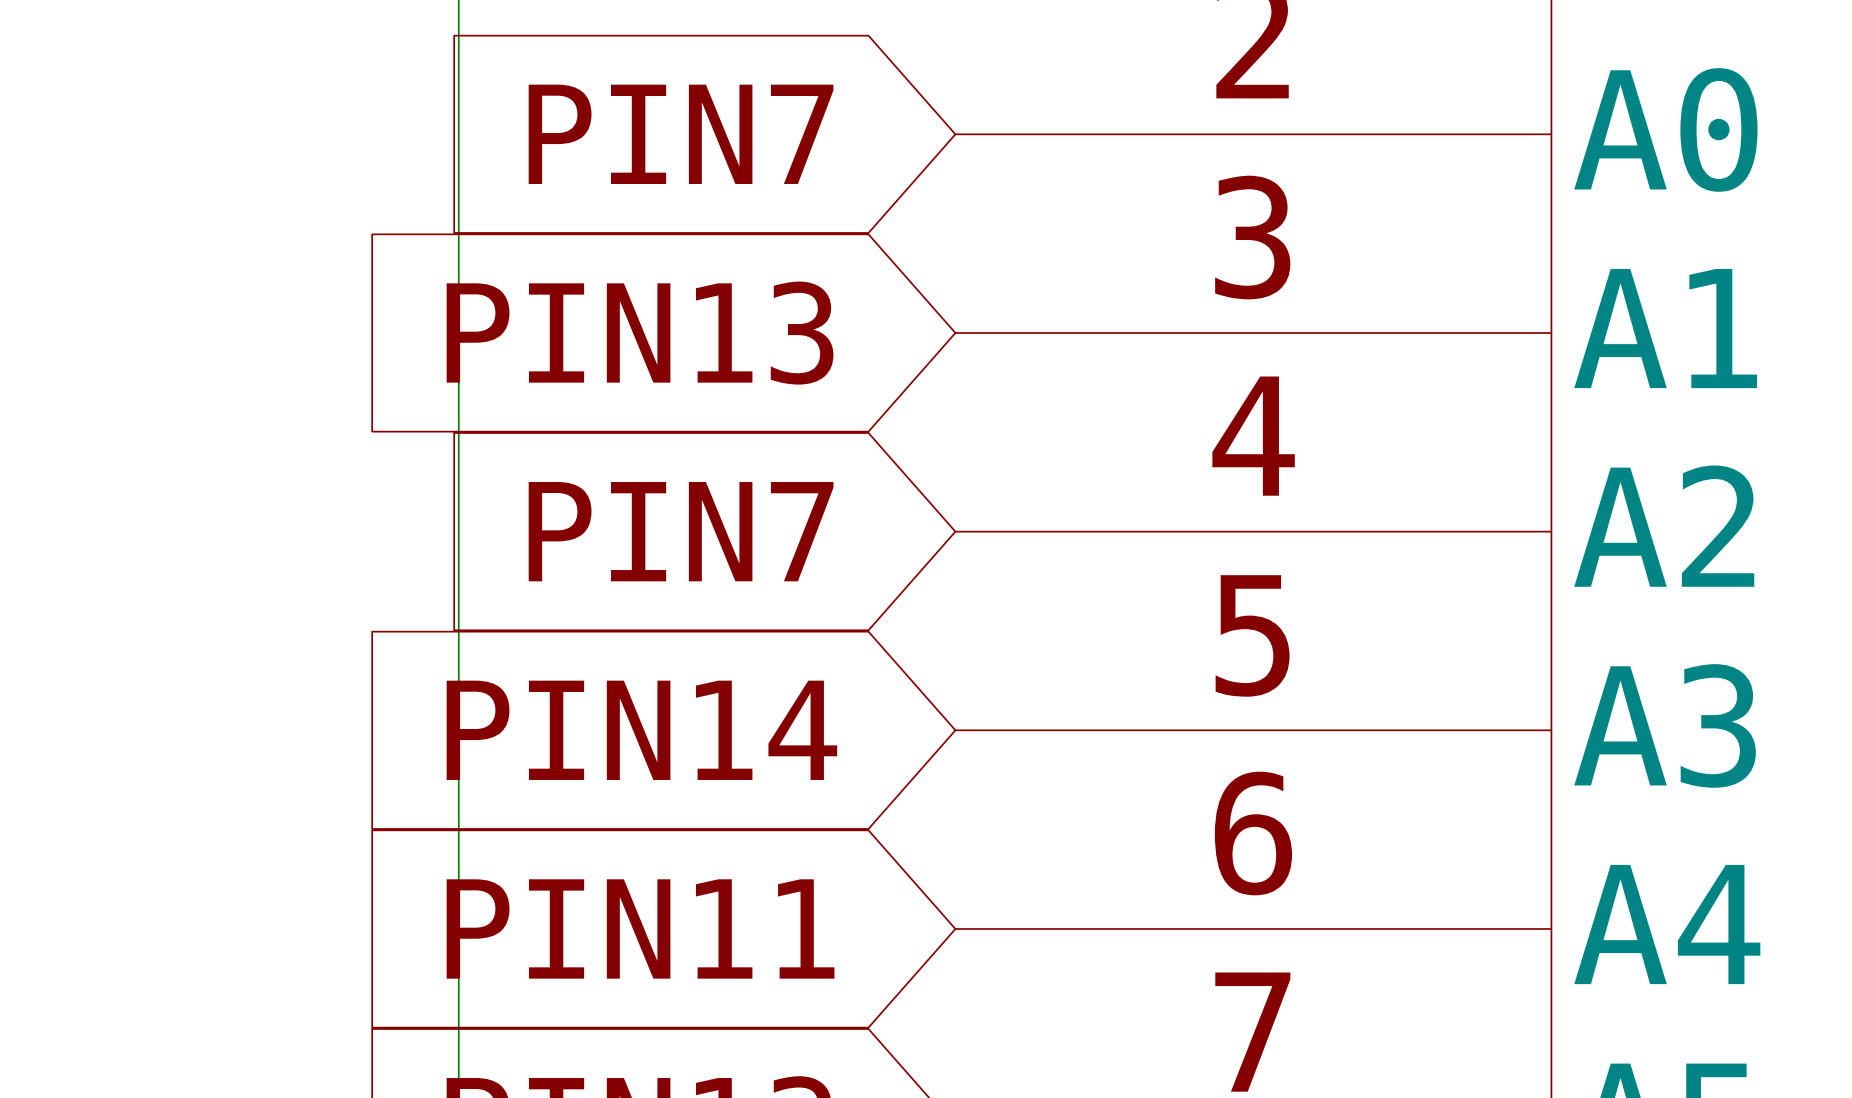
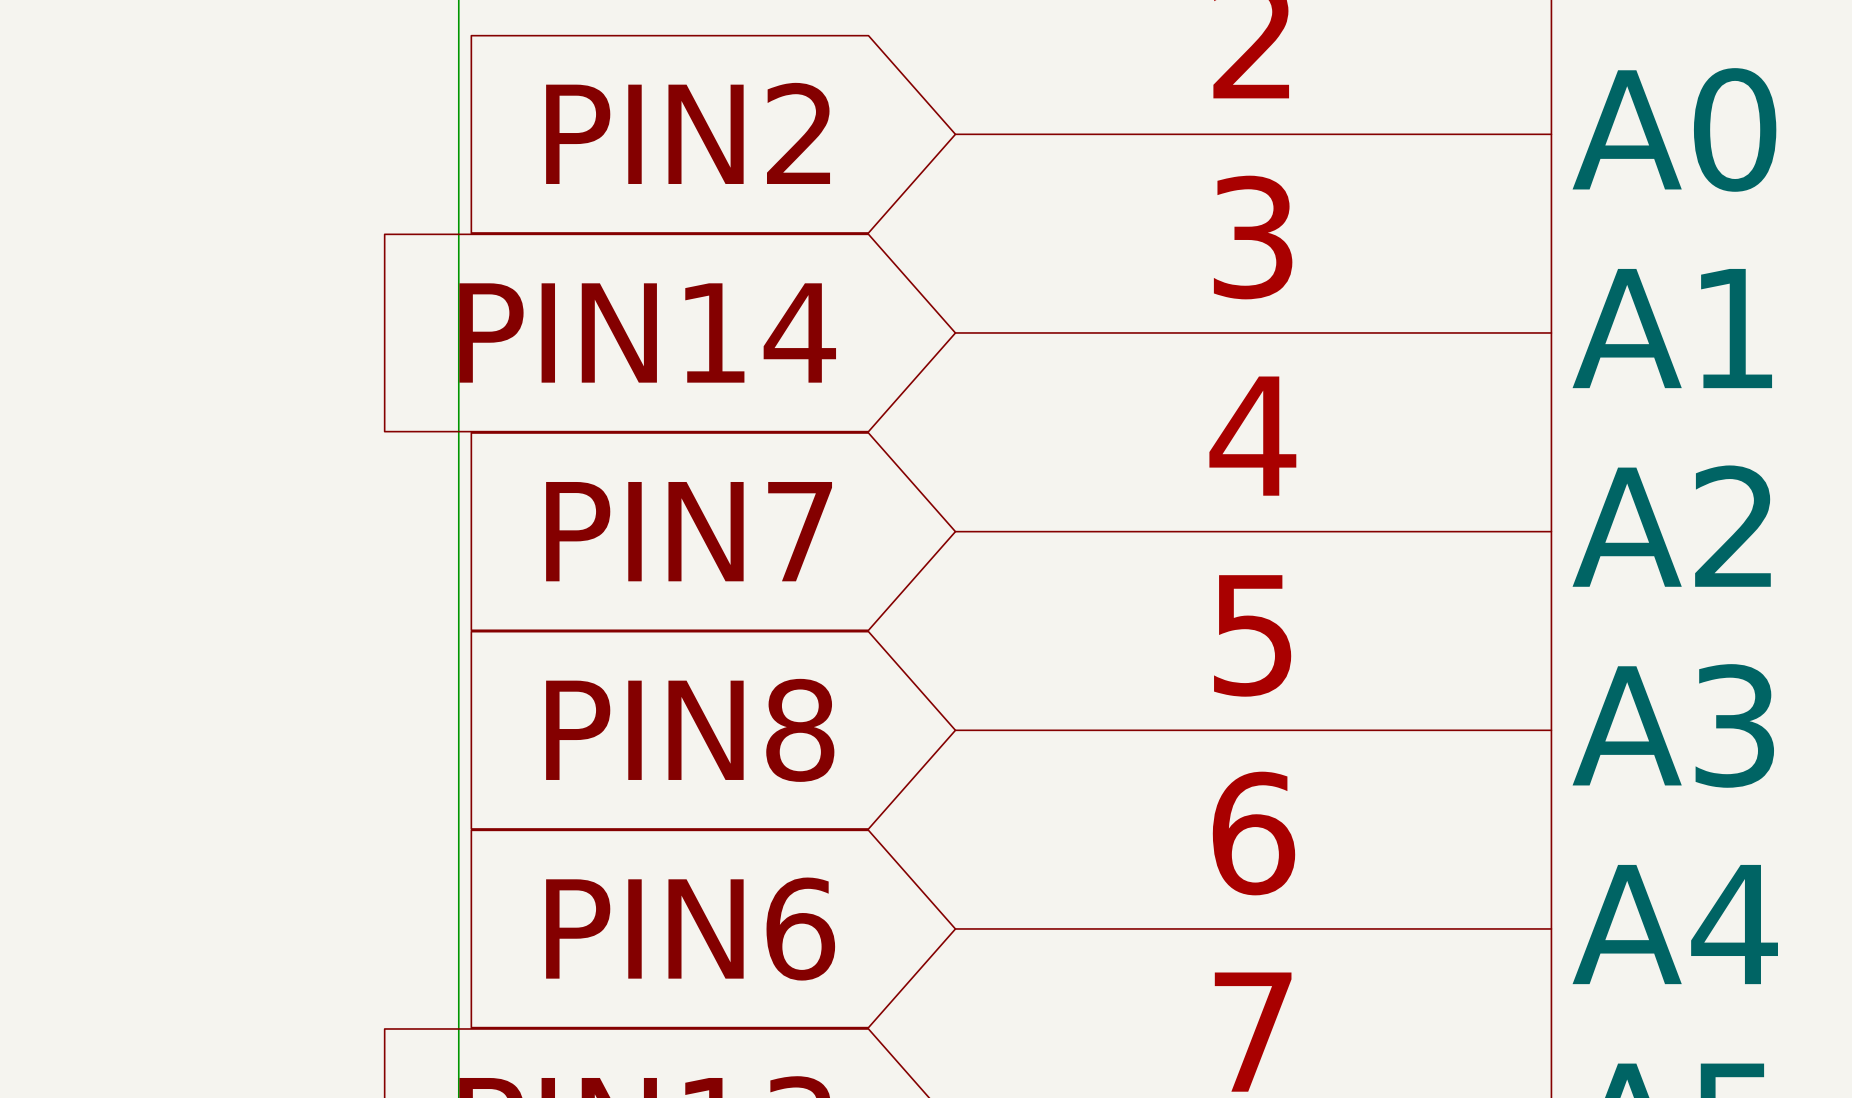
global label: PIN7 (681, 134) -> PIN2 (688, 133)
global label: PIN13 (640, 333) -> PIN14 (647, 332)
global label: PIN14 (641, 730) -> PIN8 (690, 730)
global label: PIN11 (640, 928) -> PIN6 (690, 929)

